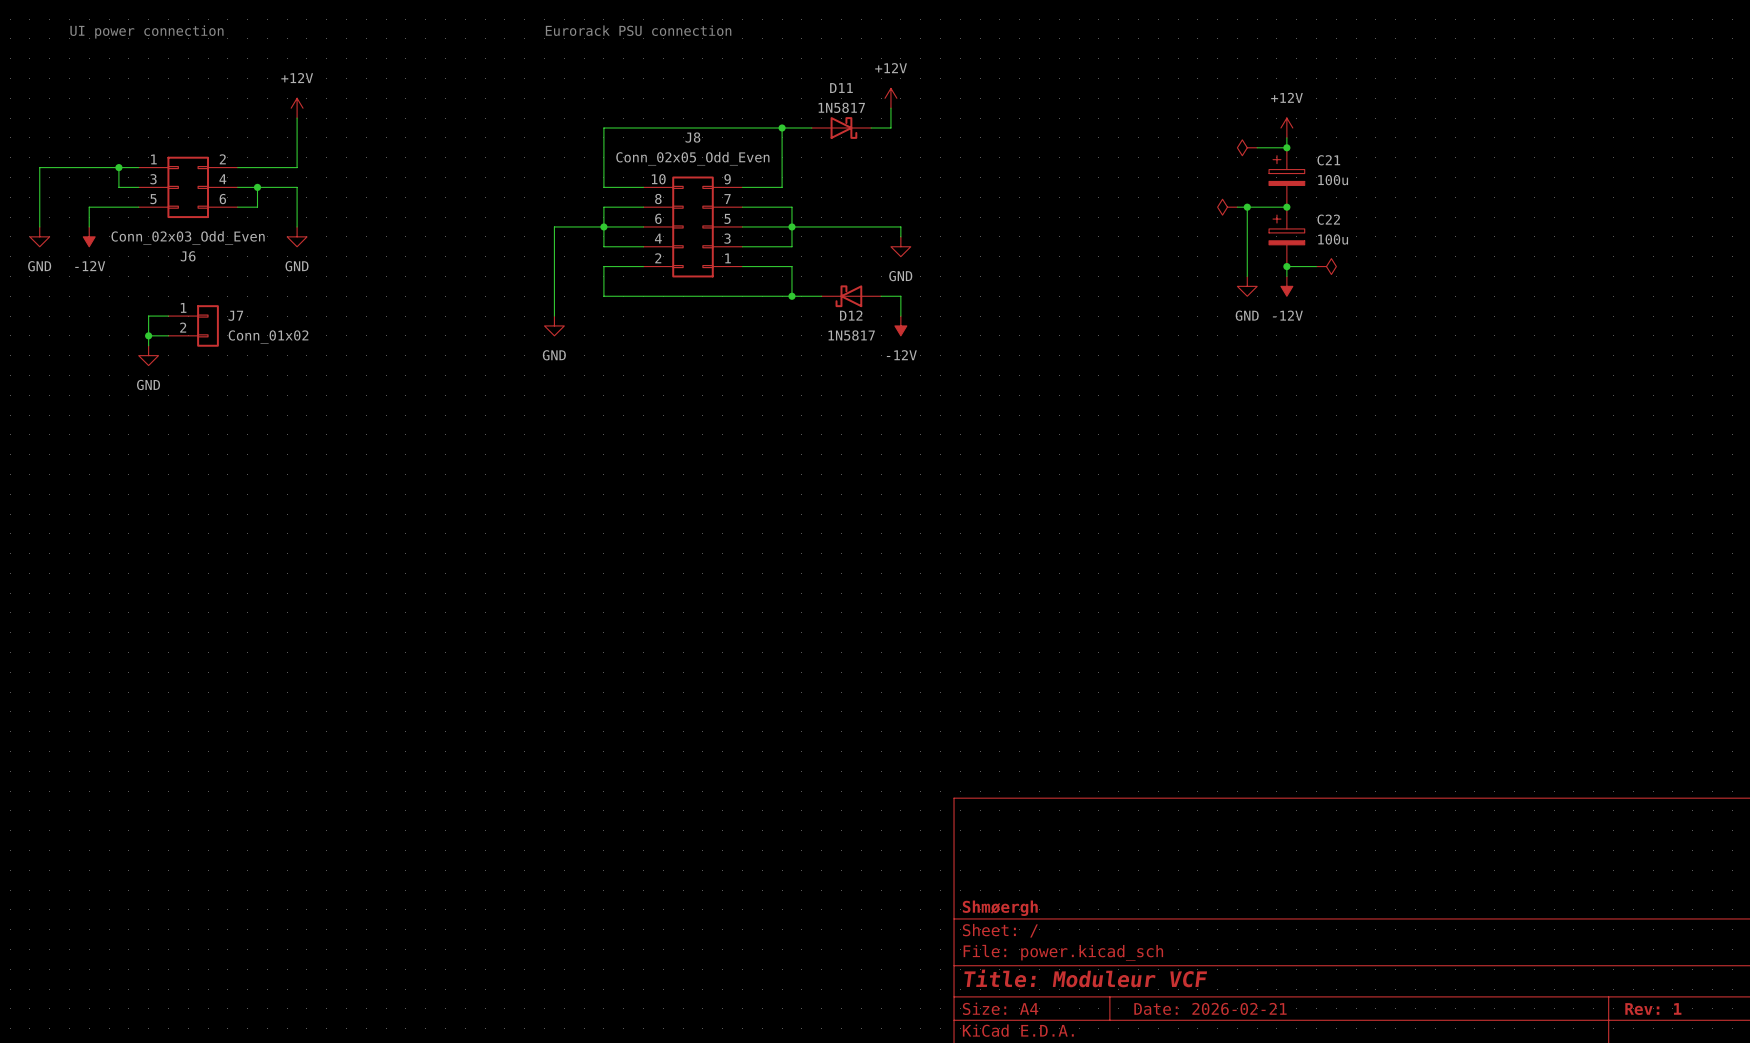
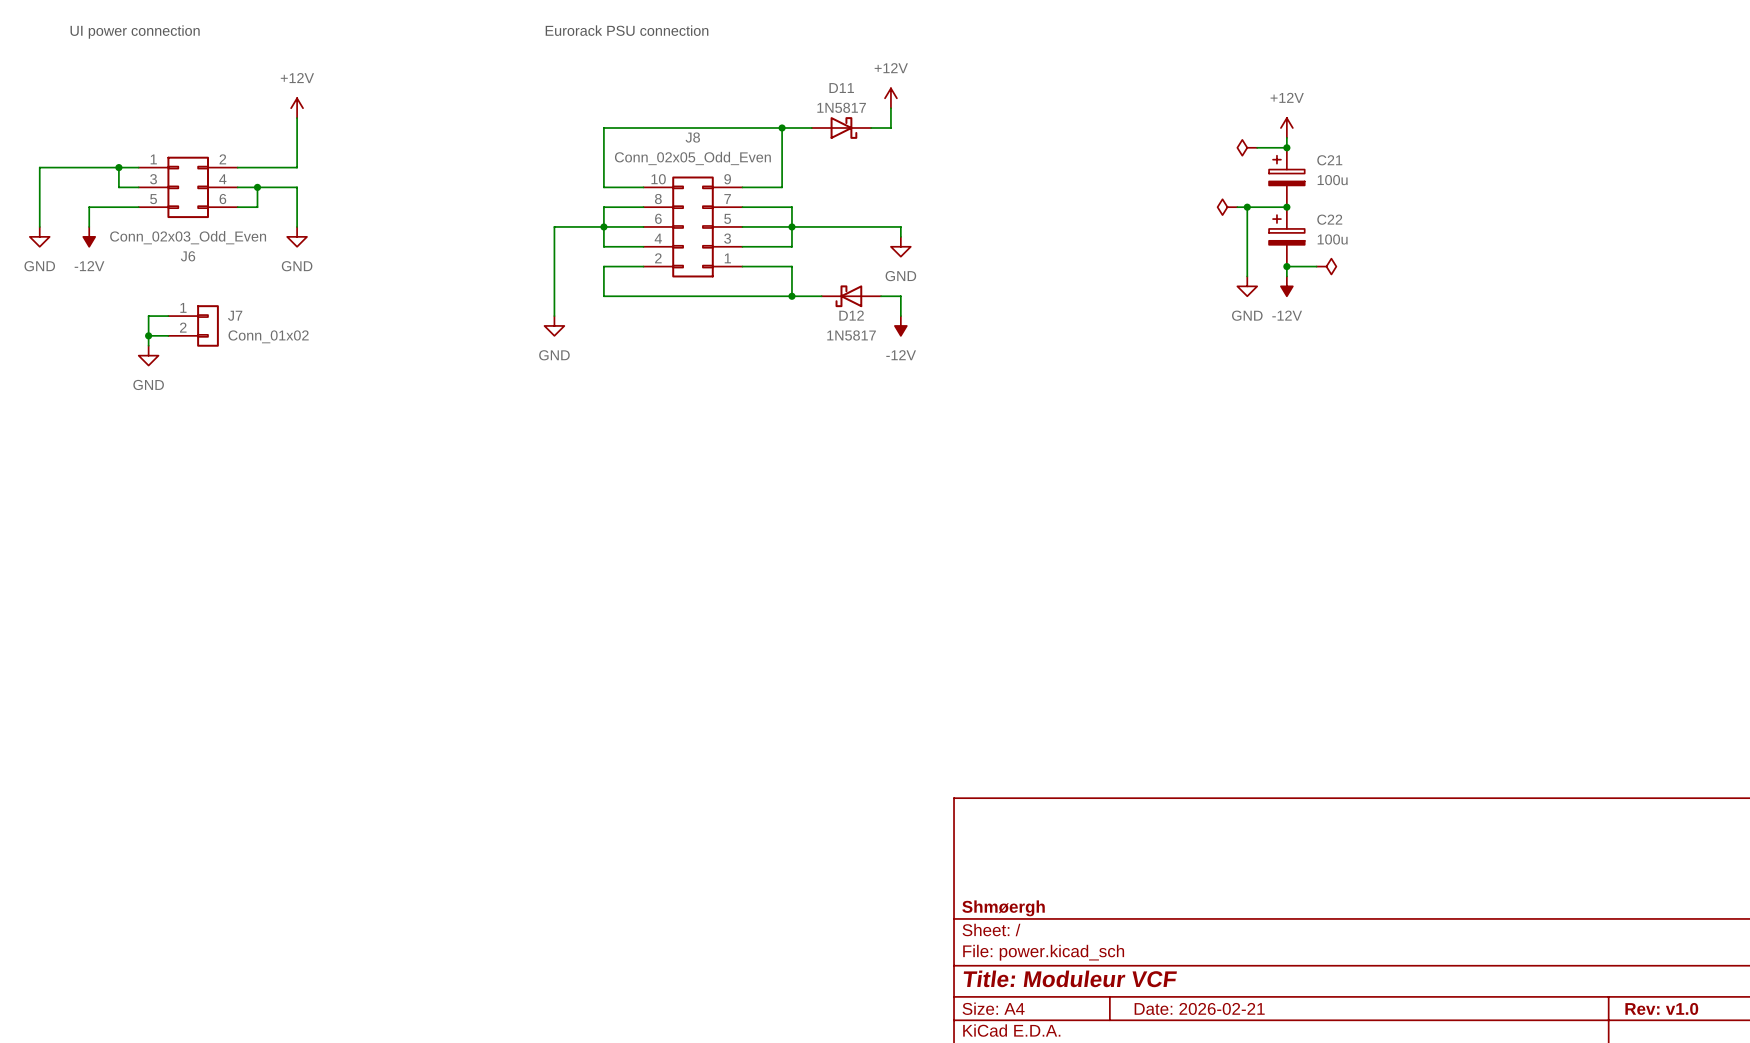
title block: Rev: 1 (1653, 1009) -> Rev: v1.0 (1661, 1008)

